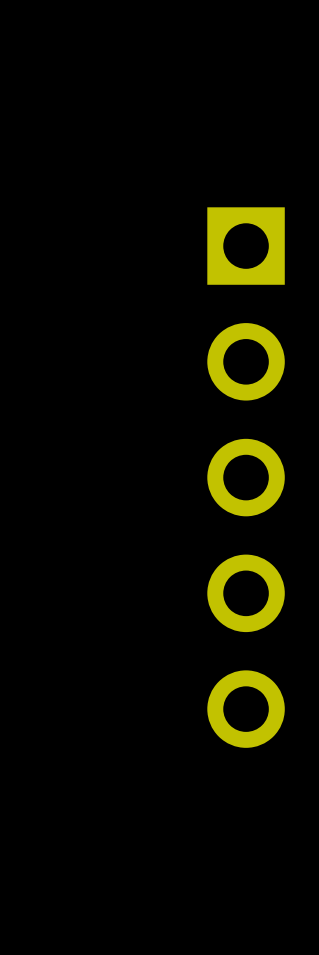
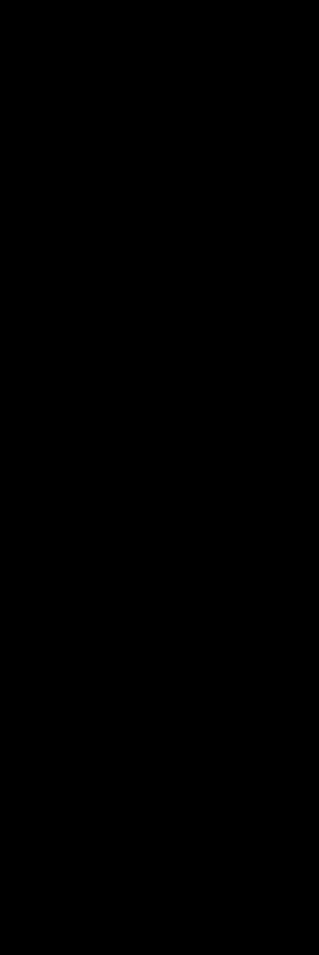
part: (246, 477) -> none

